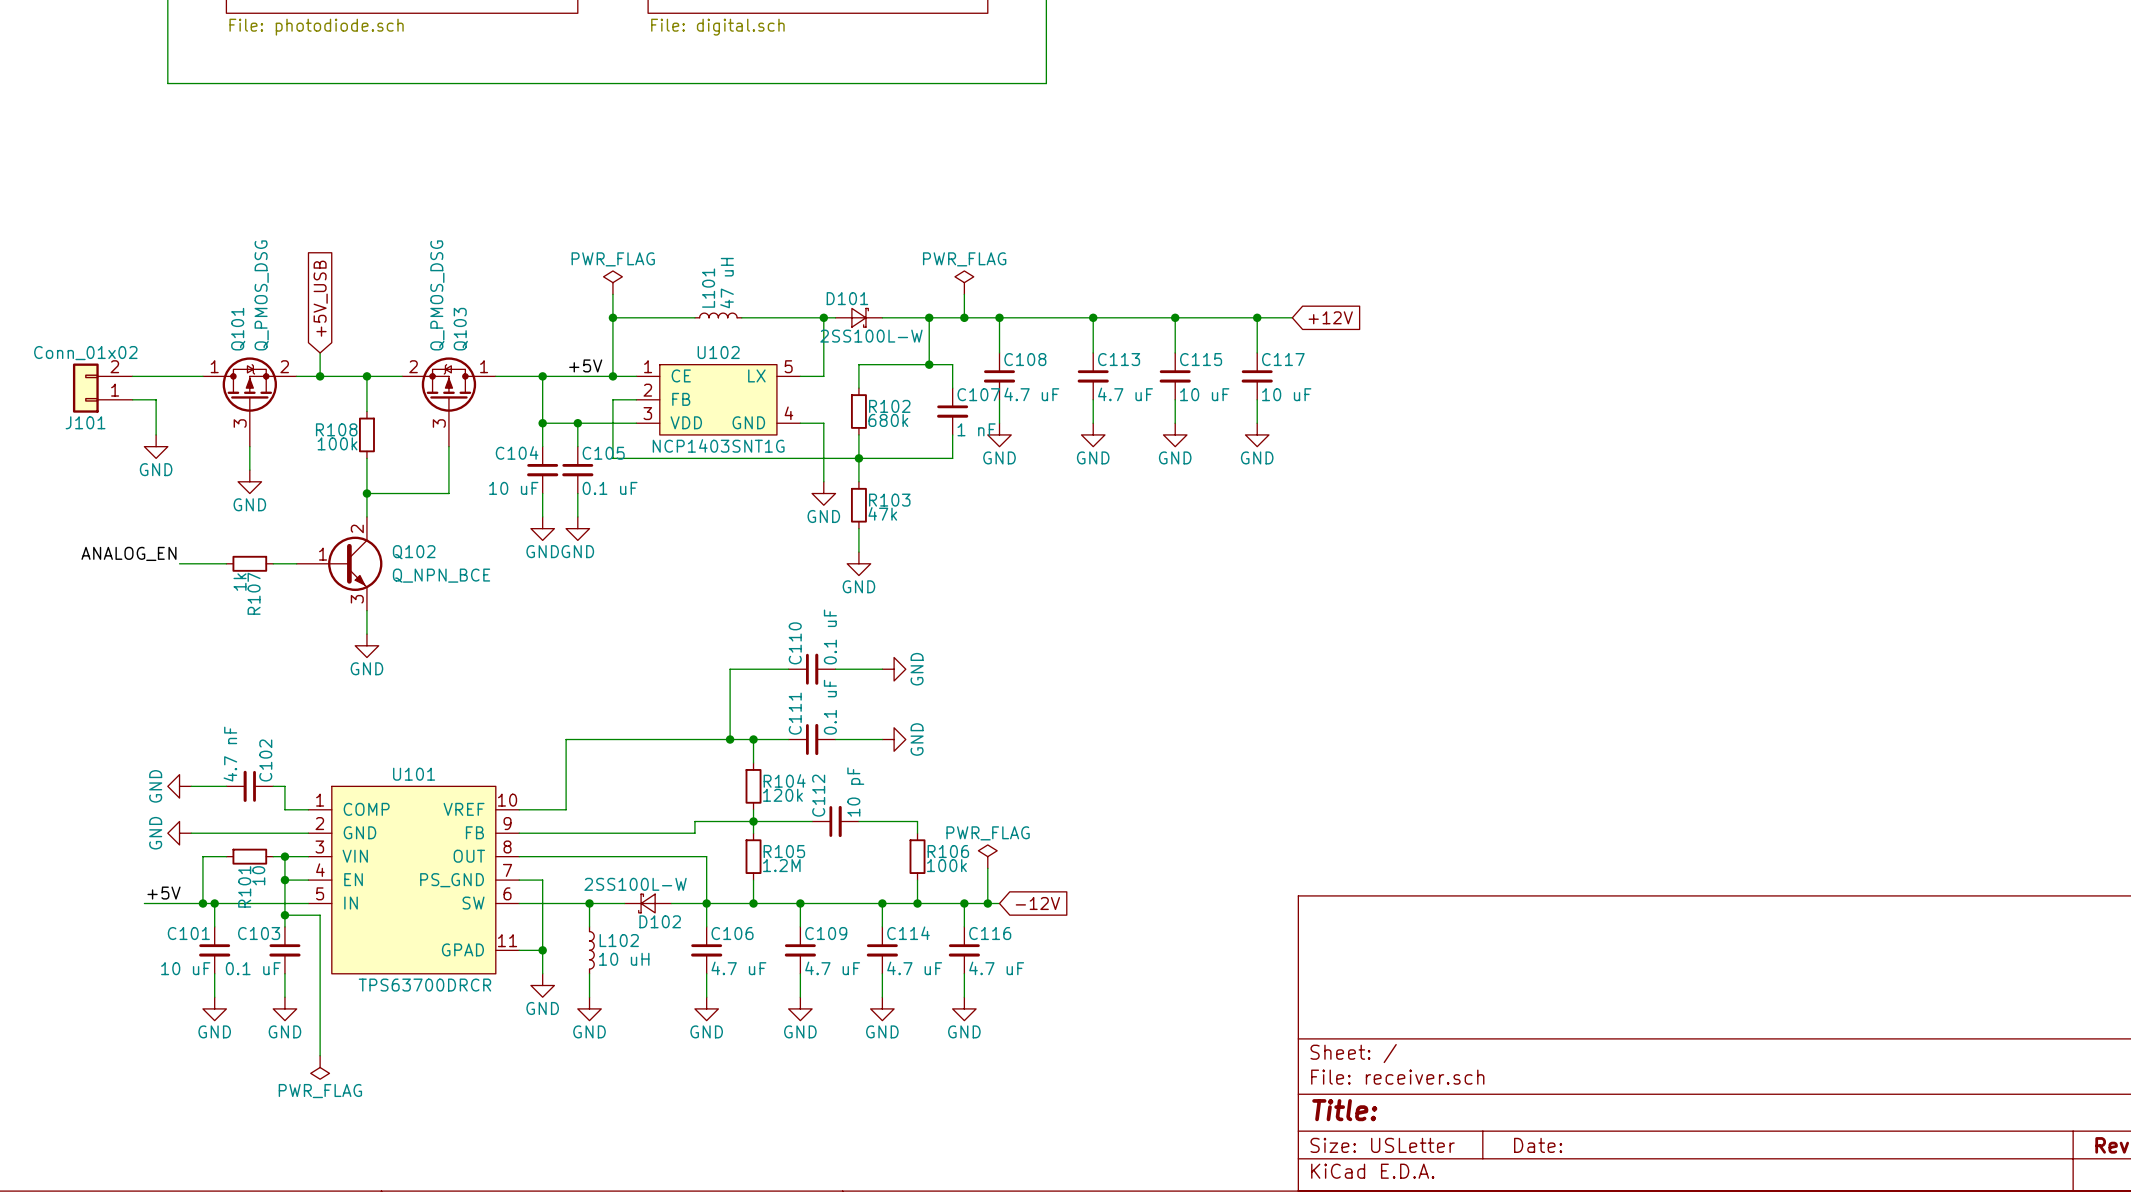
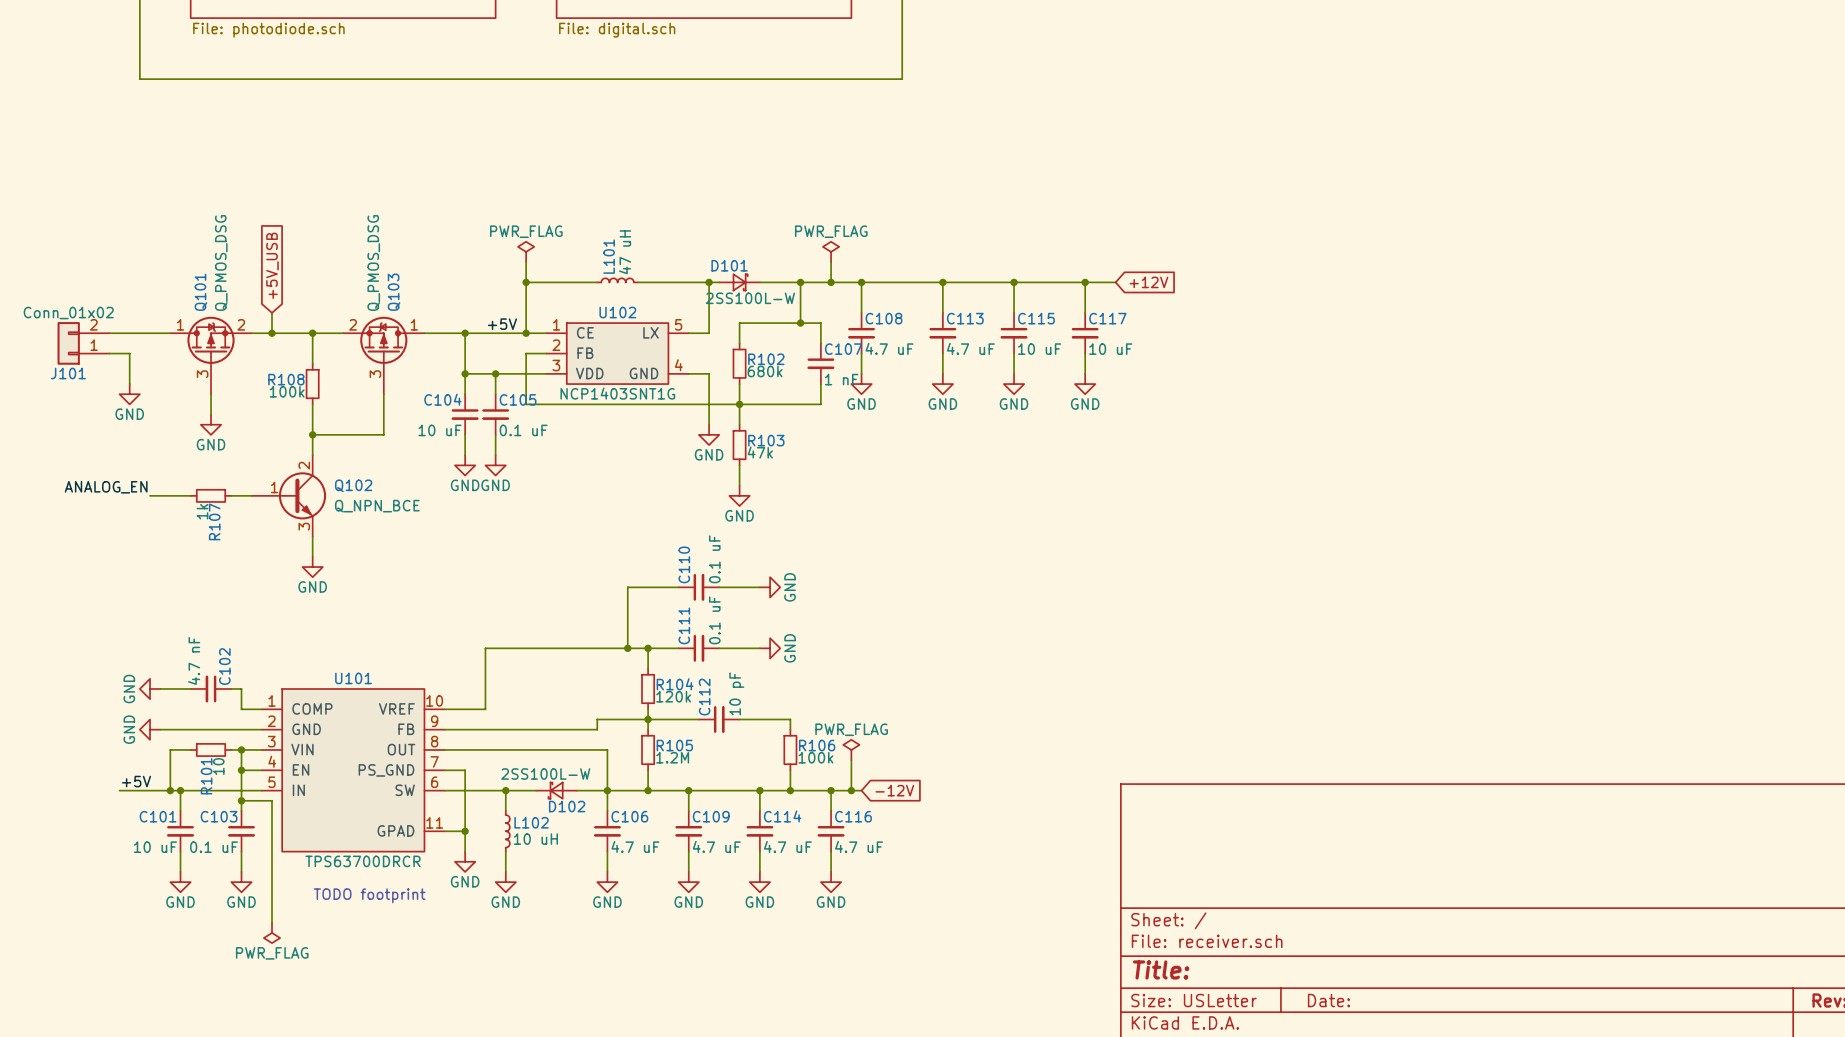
text: none -> TODO footprint (369, 895)

